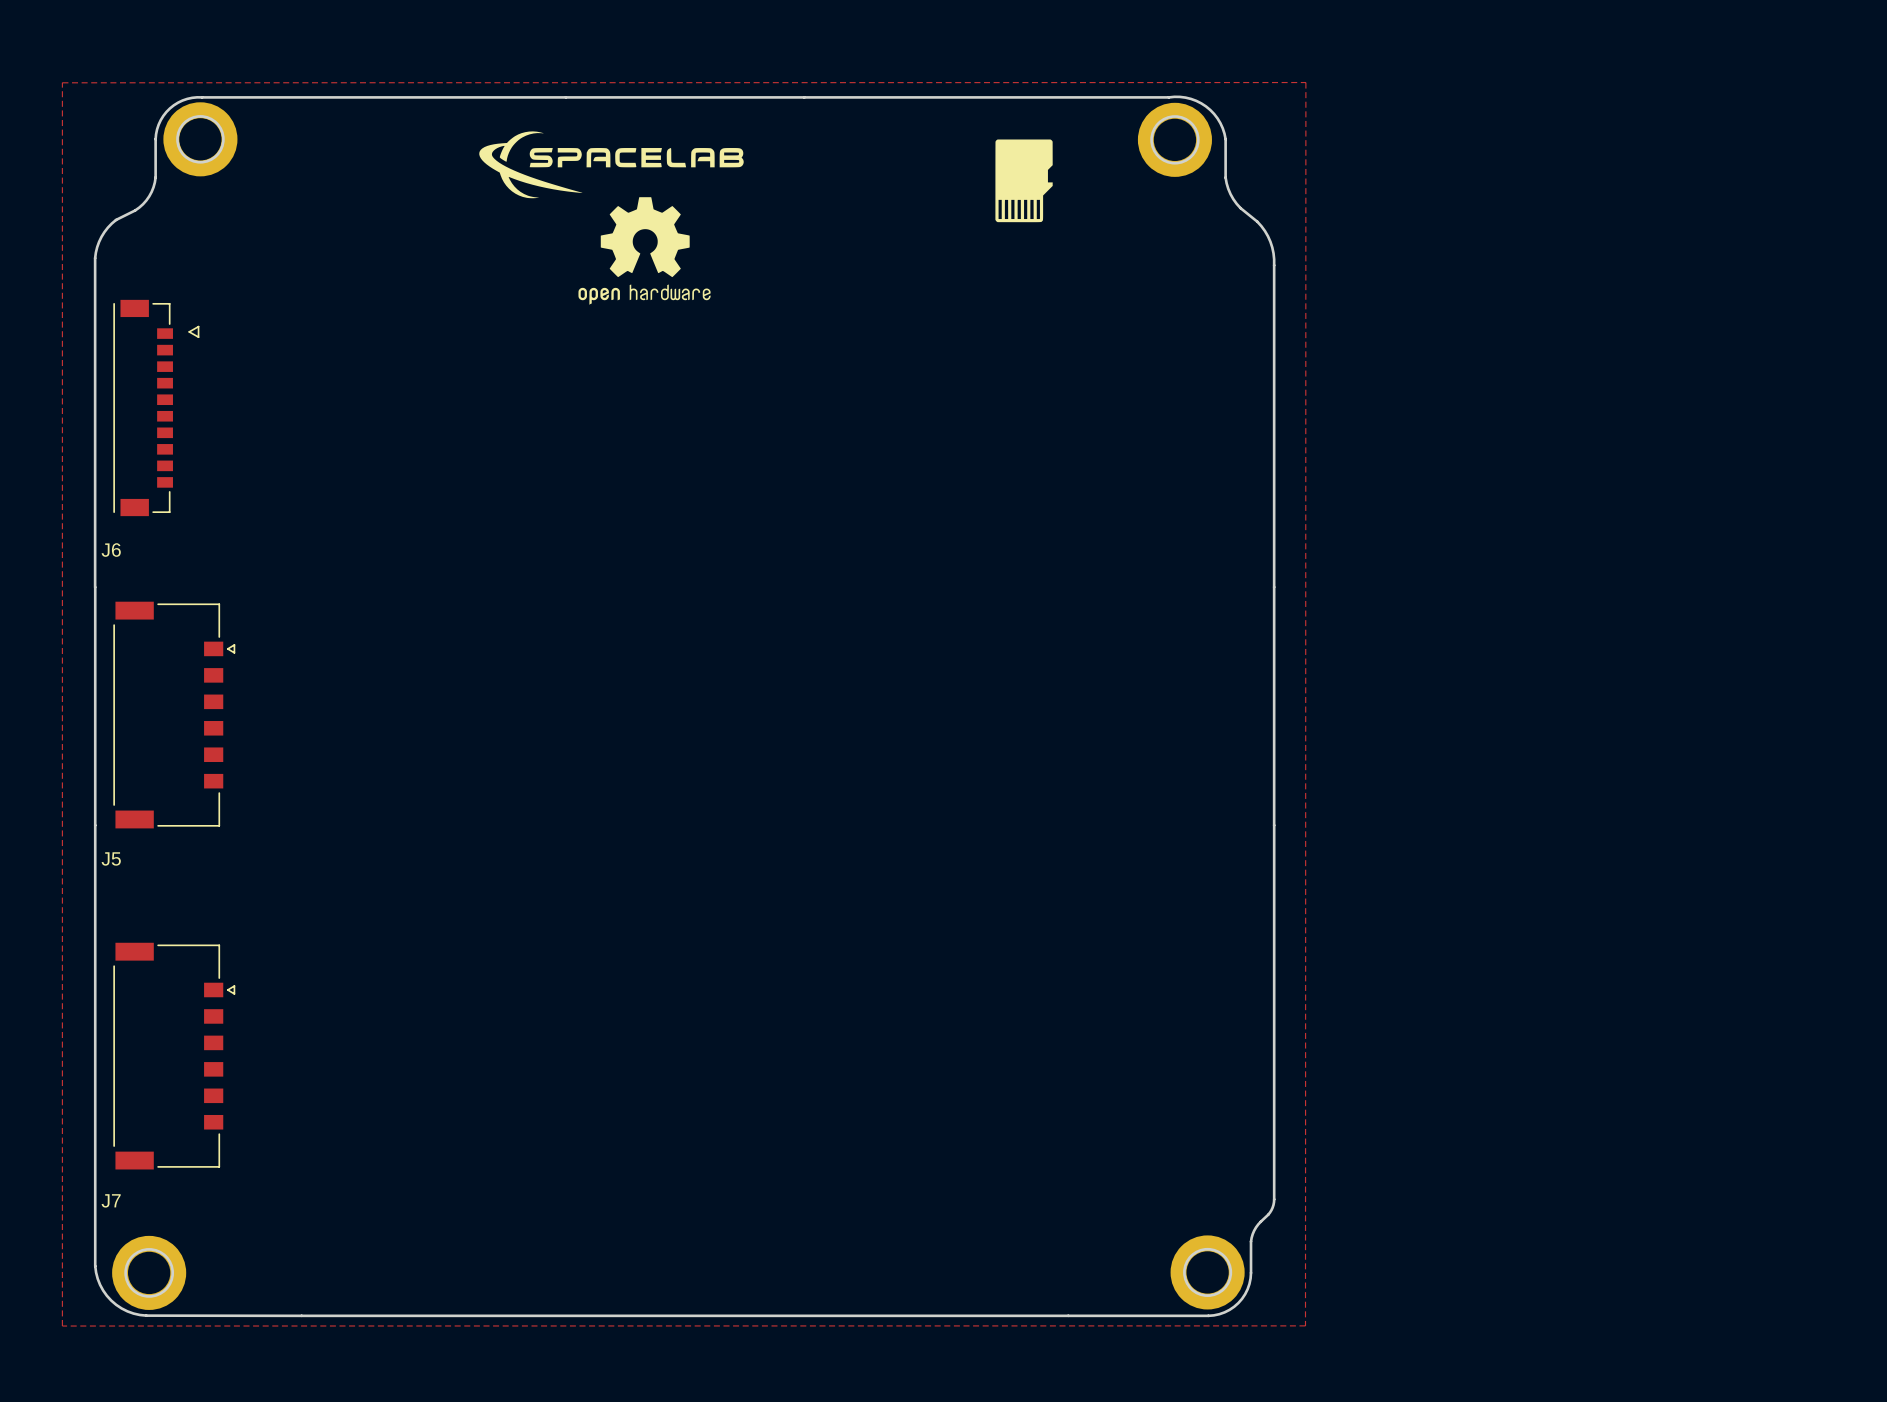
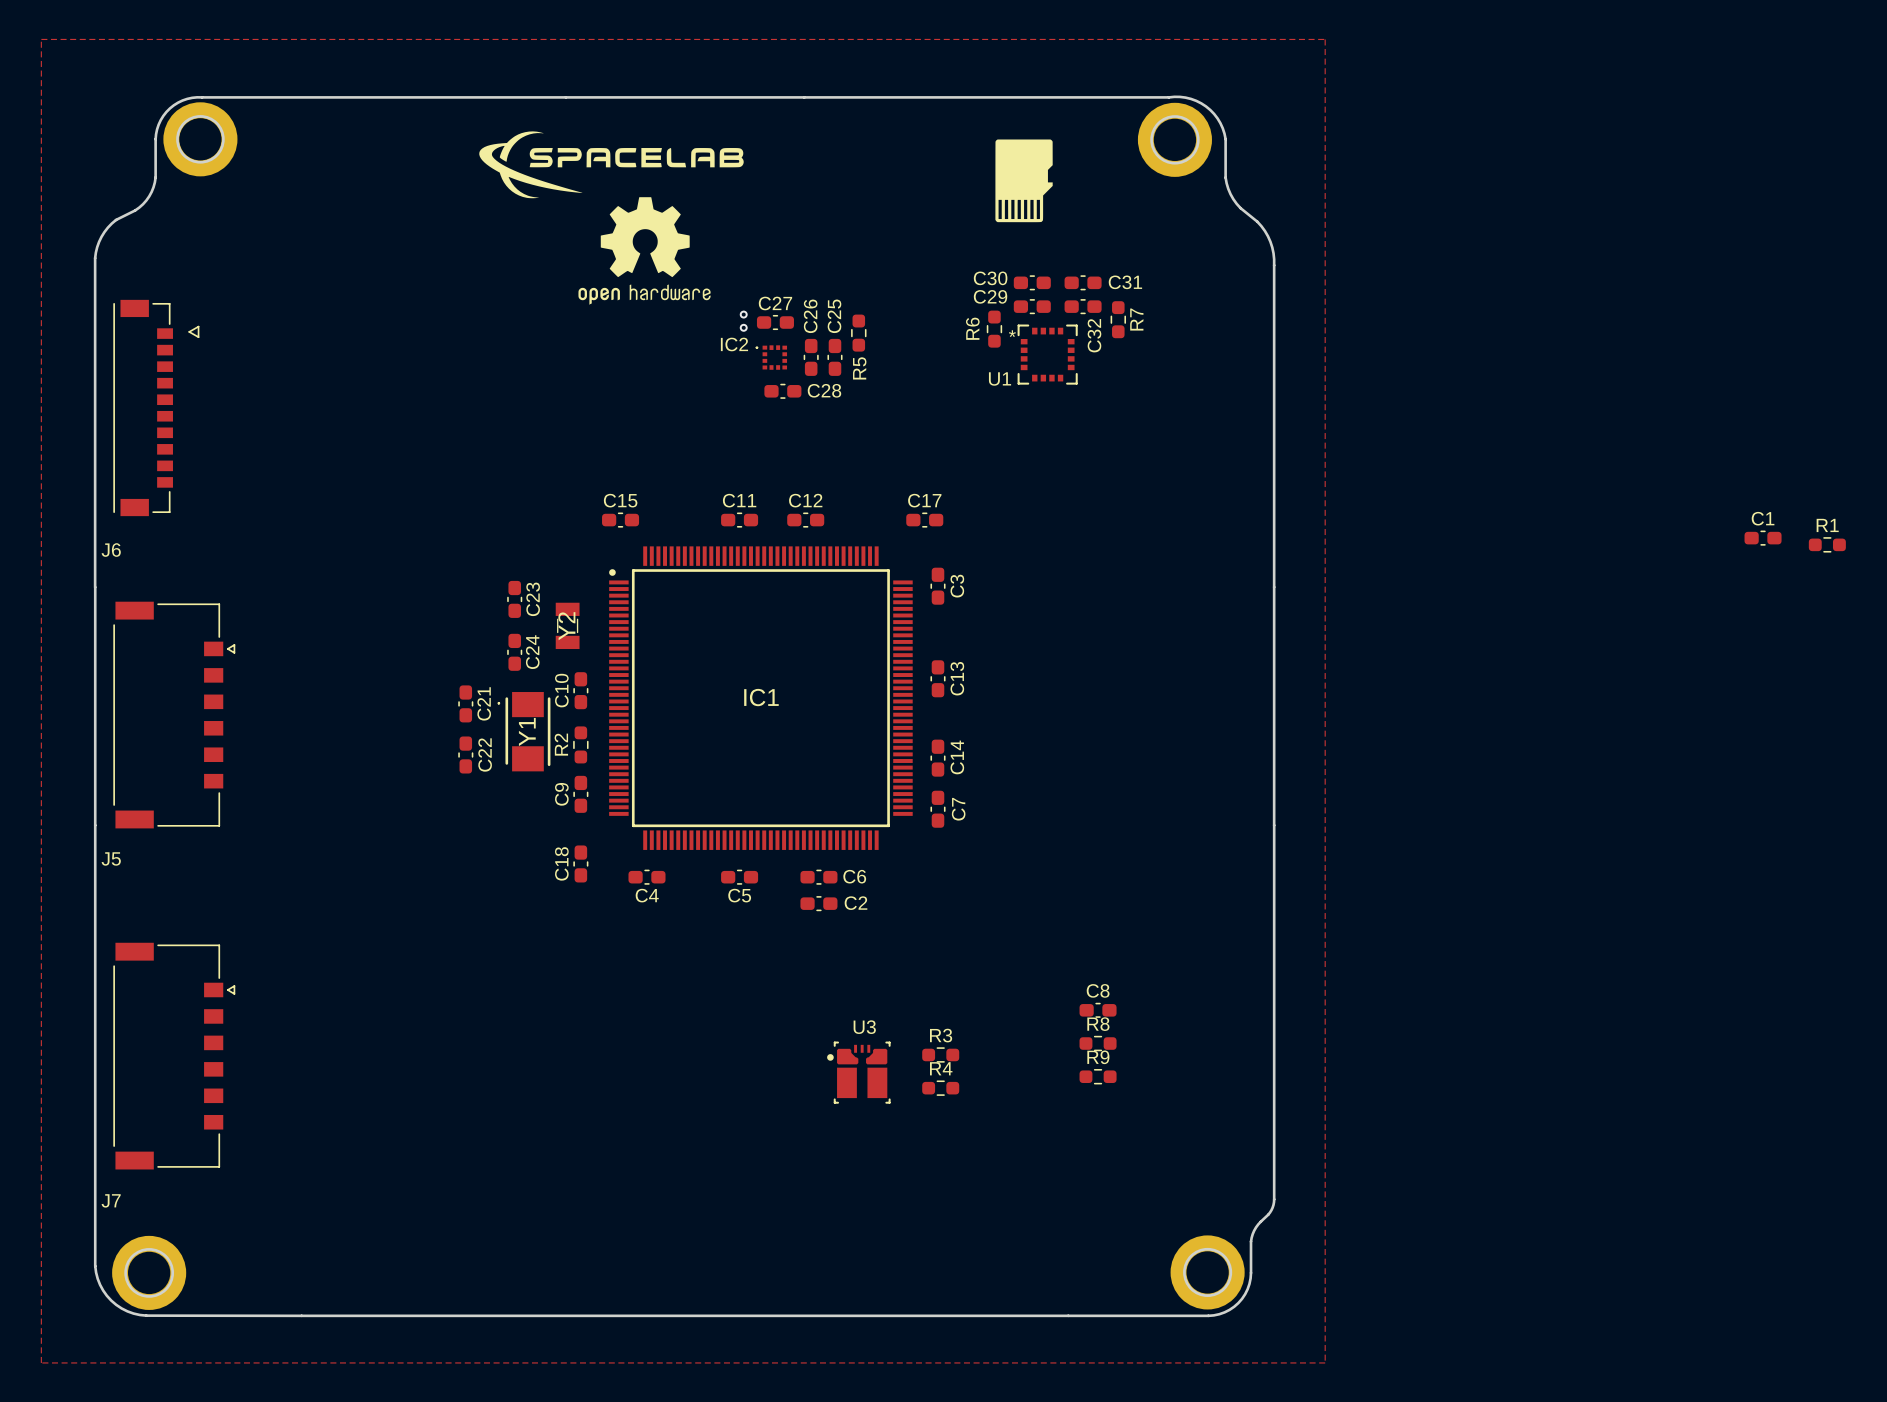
zone outline: (1305, 82) (62, 82) (62, 1326) (1305, 1325) (1305, 82) -> (41, 39) (41, 1362) (1325, 1362) (1325, 39) (41, 39)
C30: none -> (1032, 282)
C31: none -> (1083, 282)
C29: none -> (1032, 306)
C32: none -> (1083, 306)
via: none -> (743, 314)
R7: none -> (1118, 319)
C27: none -> (775, 322)
via: none -> (743, 327)
R6: none -> (994, 329)
R5: none -> (858, 333)
U1: none -> (1047, 354)
IC2: none -> (771, 357)
C26: none -> (811, 357)
C25: none -> (834, 357)
C28: none -> (782, 391)
C15: none -> (620, 520)
C11: none -> (739, 520)
C12: none -> (805, 520)
C17: none -> (924, 520)
C1: none -> (1763, 538)
R1: none -> (1827, 544)
C3: none -> (937, 586)
C23: none -> (514, 599)
Y2: none -> (567, 625)
C24: none -> (514, 652)
C13: none -> (937, 678)
C10: none -> (580, 690)
IC1: none -> (760, 698)
C21: none -> (465, 703)
Y1: none -> (523, 731)
R2: none -> (580, 744)
C22: none -> (465, 755)
C14: none -> (937, 758)
C9: none -> (580, 794)
C7: none -> (937, 809)
C18: none -> (580, 863)
C4: none -> (647, 877)
C5: none -> (739, 877)
C6: none -> (818, 877)
C2: none -> (818, 903)
C8: none -> (1098, 1010)
R8: none -> (1098, 1043)
R3: none -> (940, 1054)
U3: none -> (858, 1072)
R9: none -> (1098, 1076)
R4: none -> (940, 1088)

